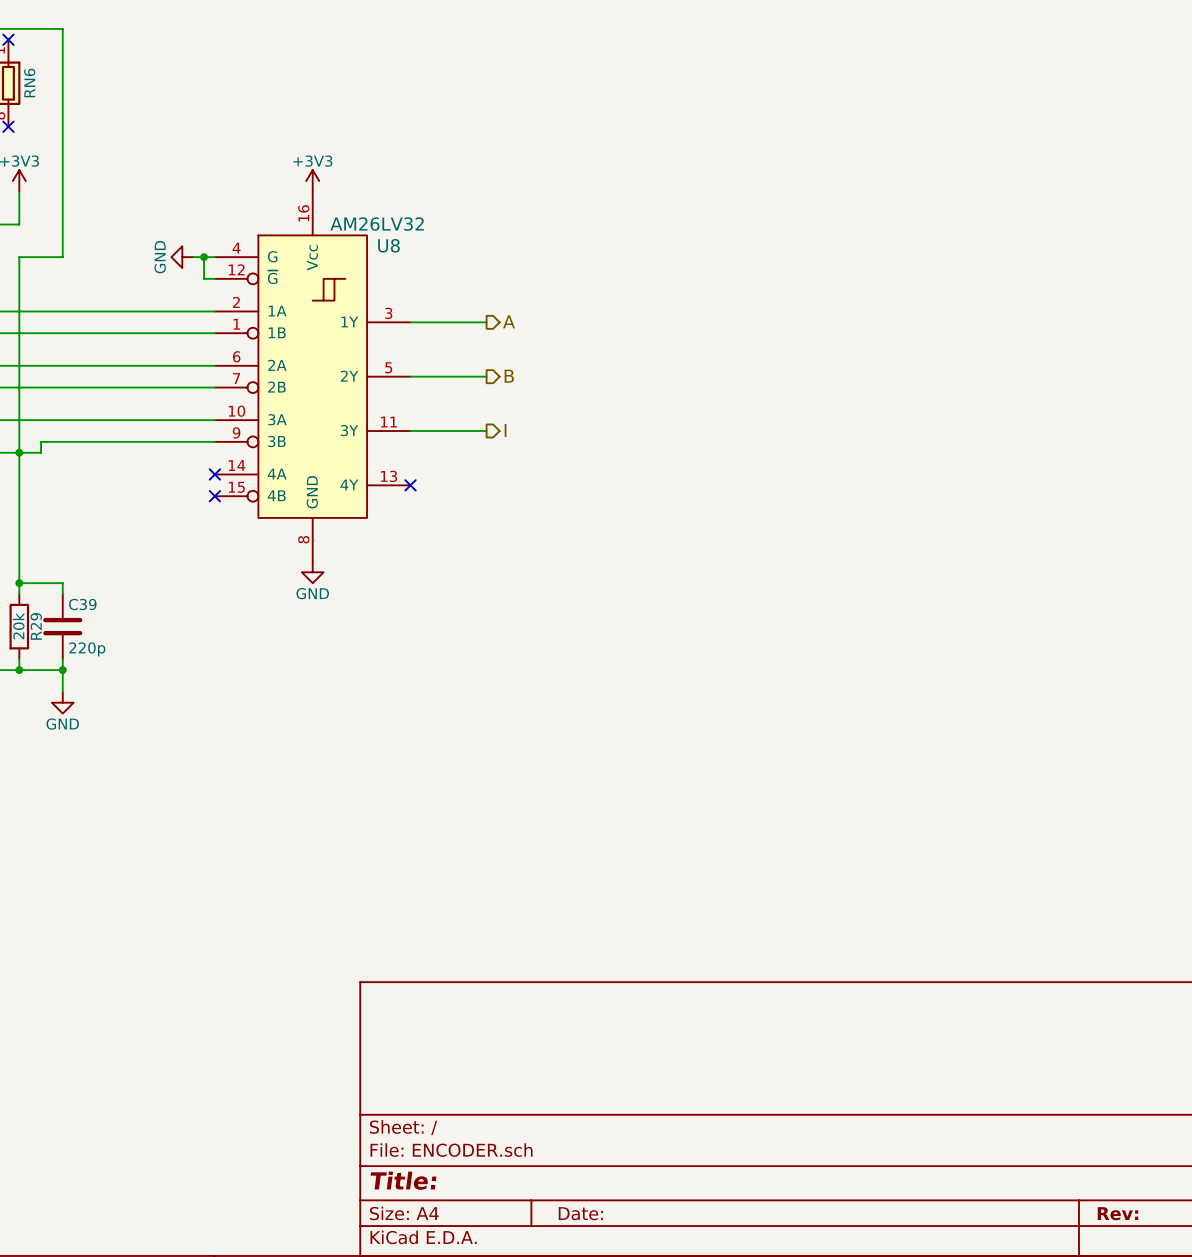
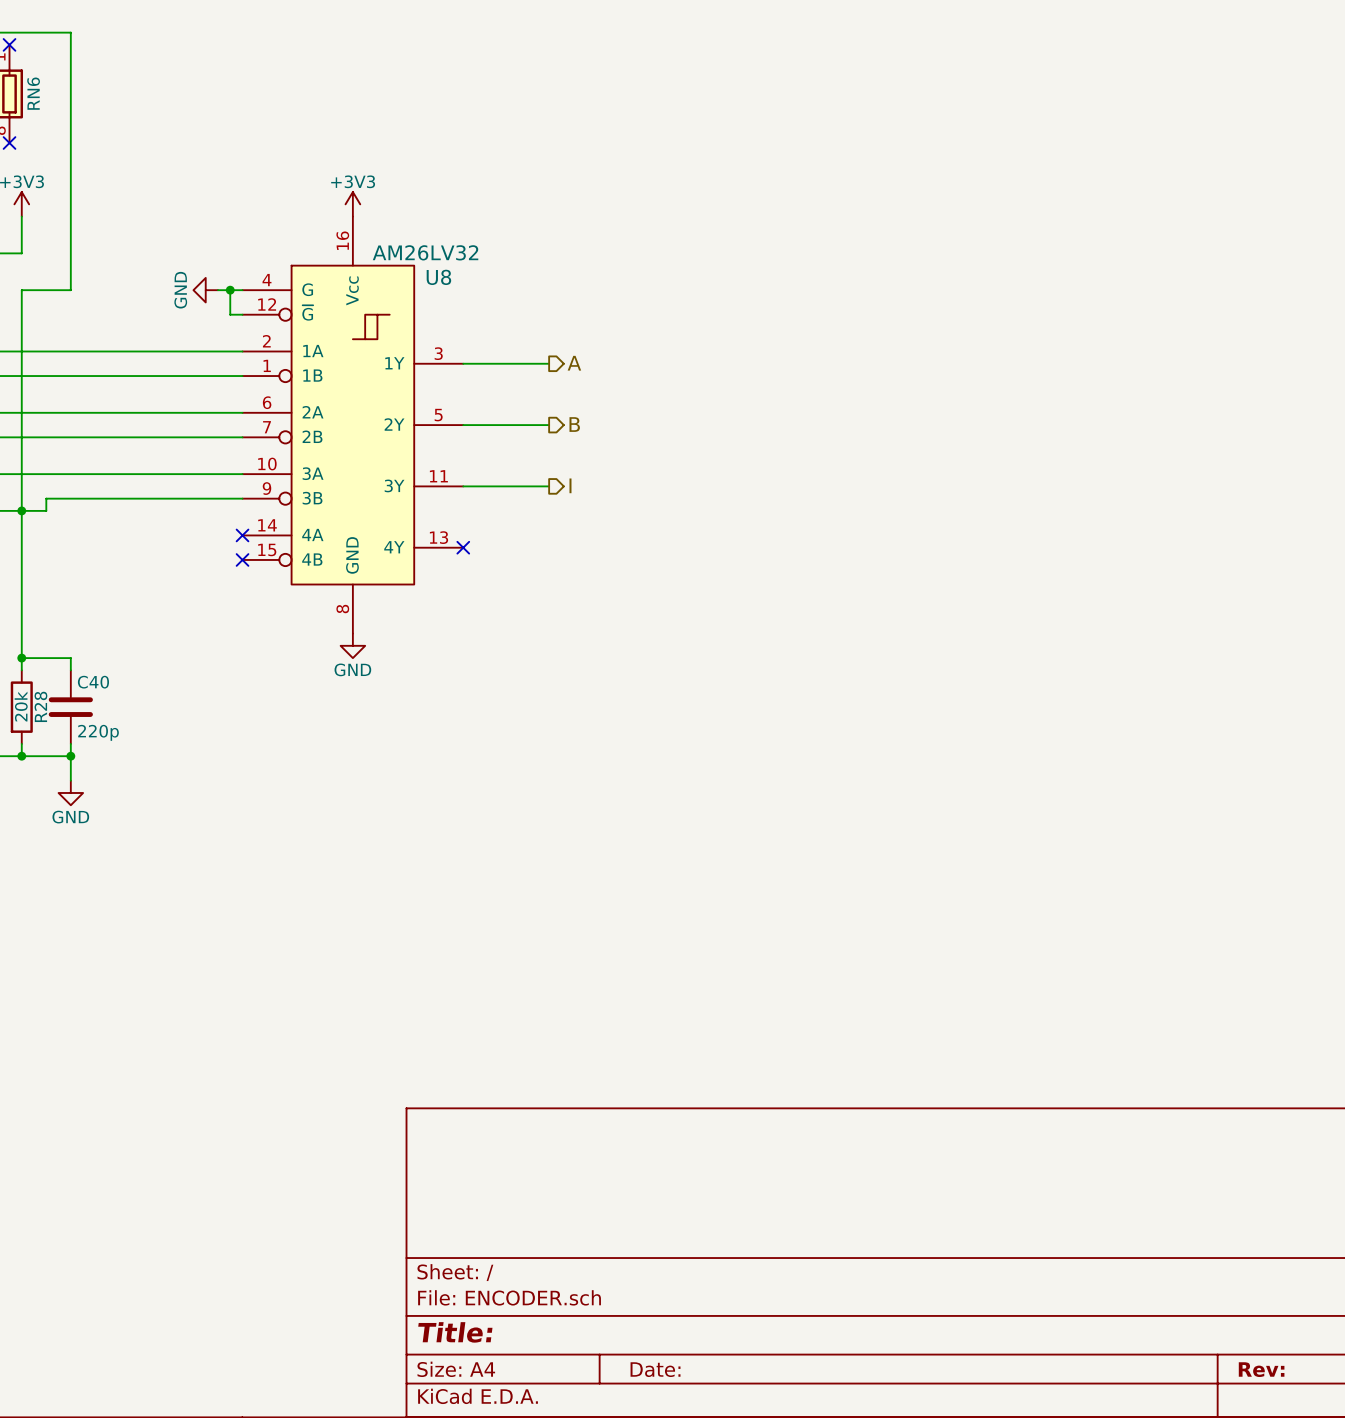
C39 name: C39 (82, 604) -> C40 (93, 682)
R29 name: R29 (36, 626) -> R28 (40, 706)

